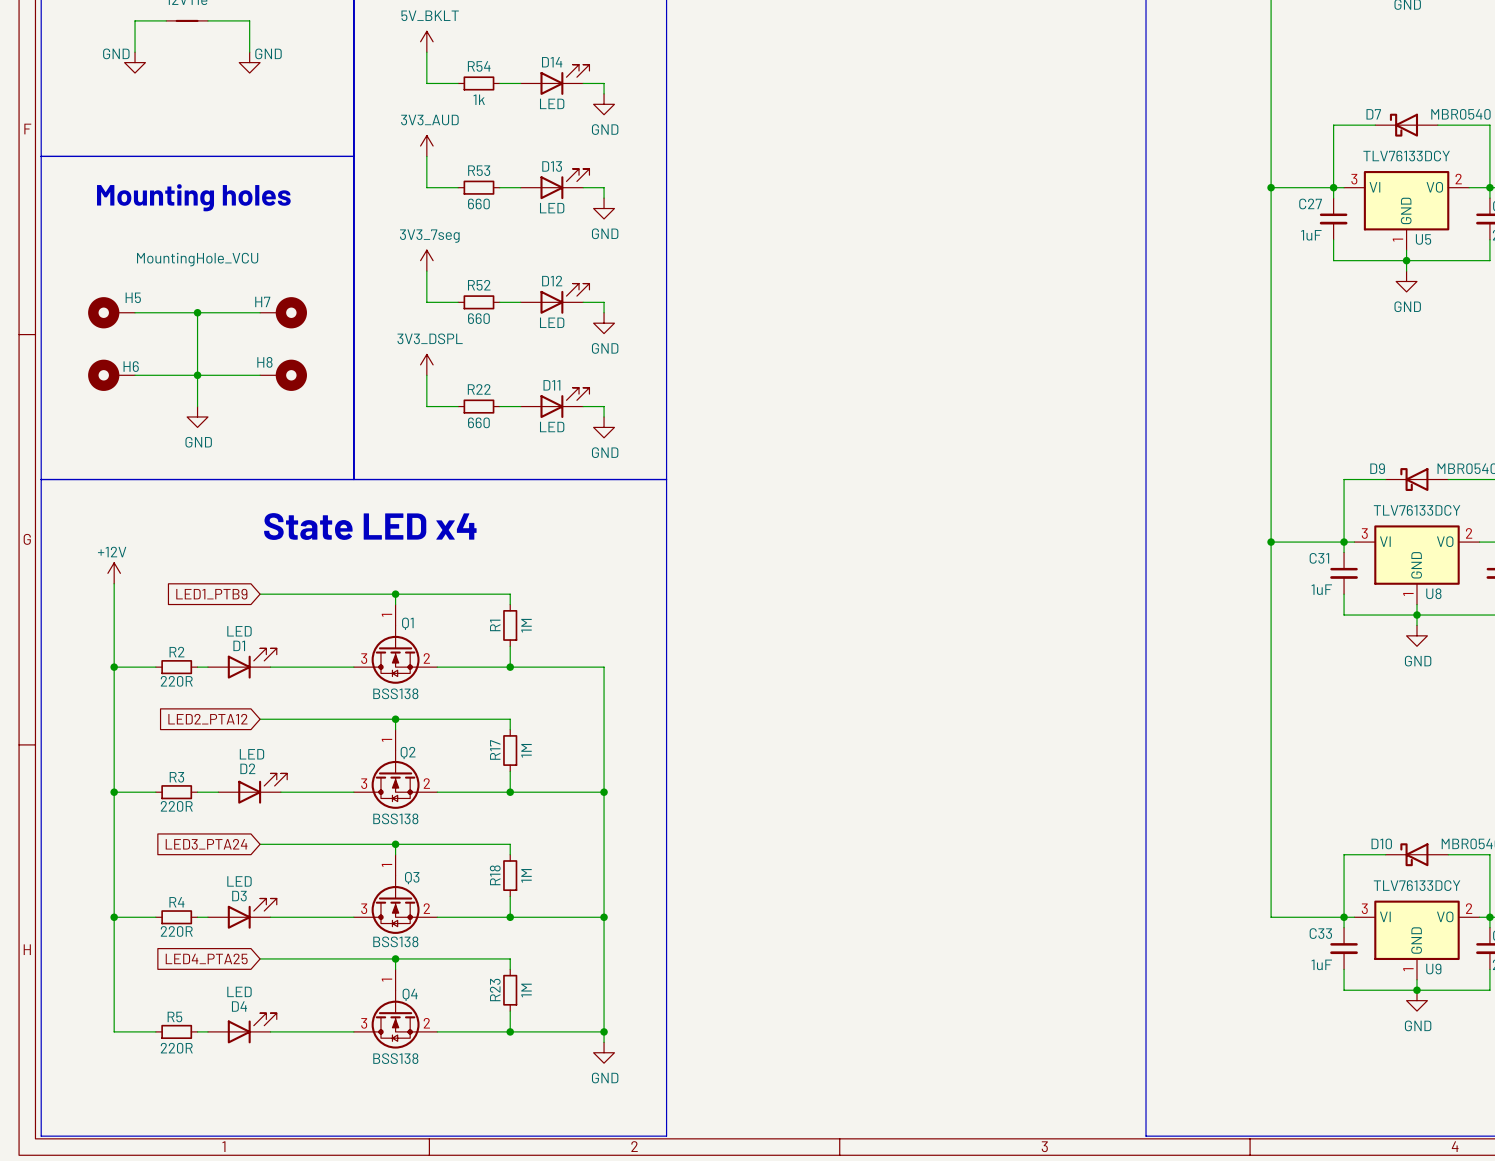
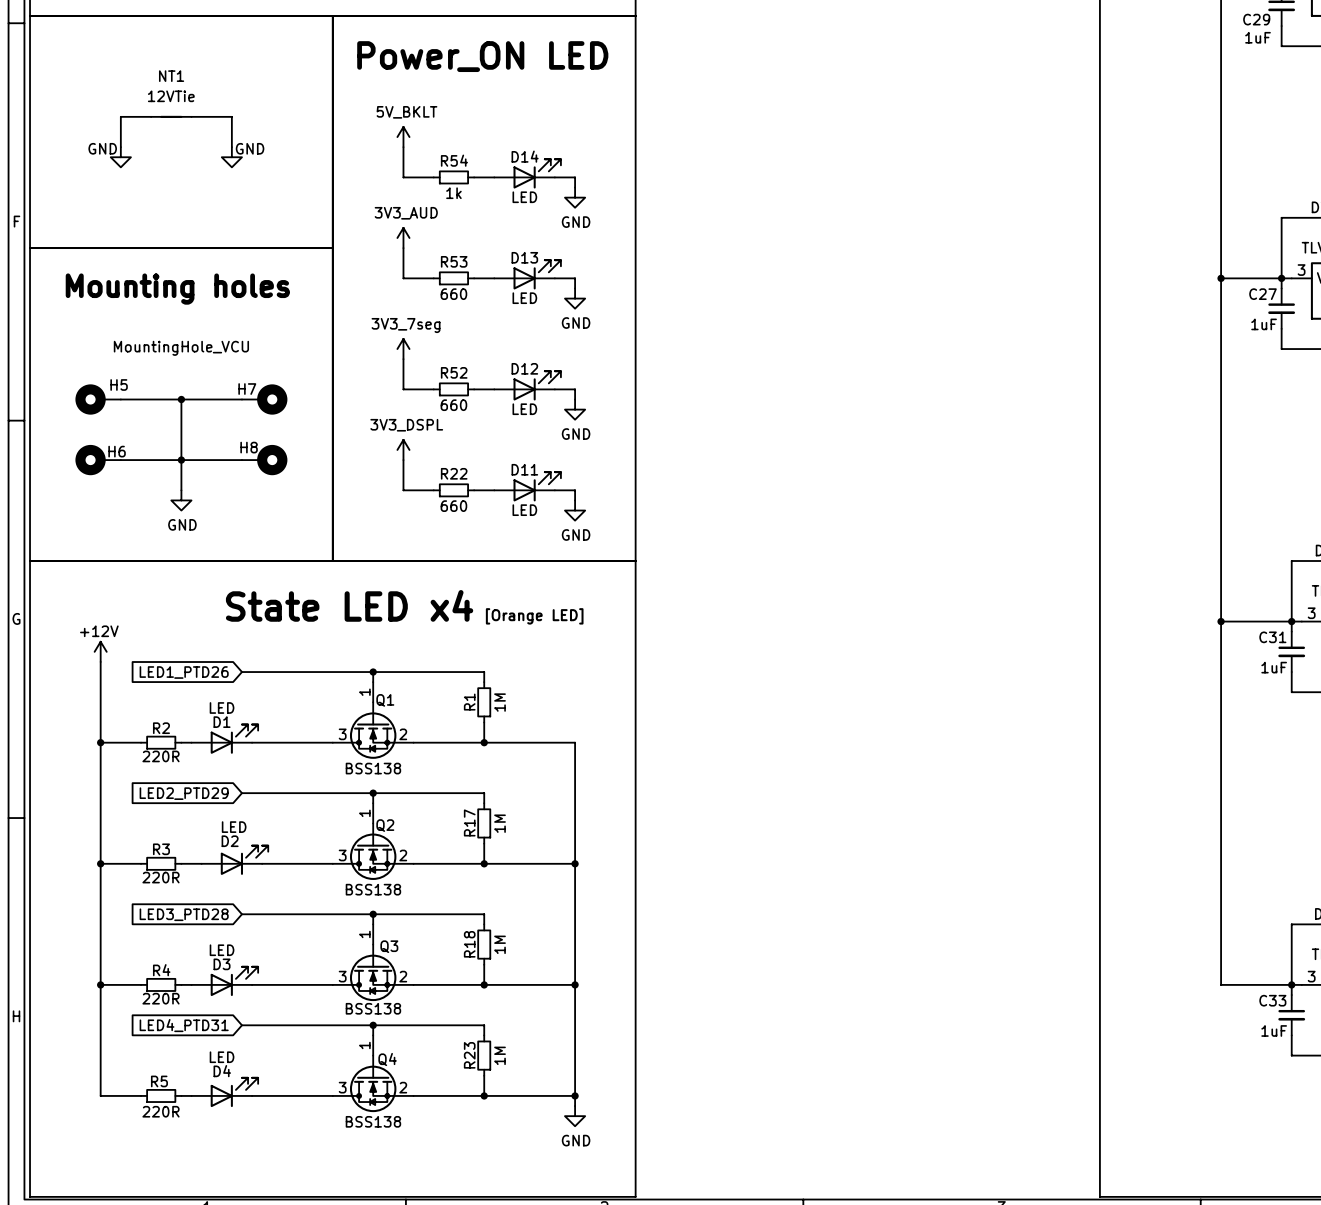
text: none -> [Orange LED] (534, 616)
global label: LED1_PTB9 (211, 594) -> LED1_PTD26 (184, 672)
global label: LED2_PTA12 (207, 719) -> LED2_PTD29 (184, 793)
global label: LED3_PTA24 (206, 844) -> LED3_PTD28 (184, 914)
global label: LED4_PTA25 (206, 958) -> LED4_PTD31 (184, 1025)

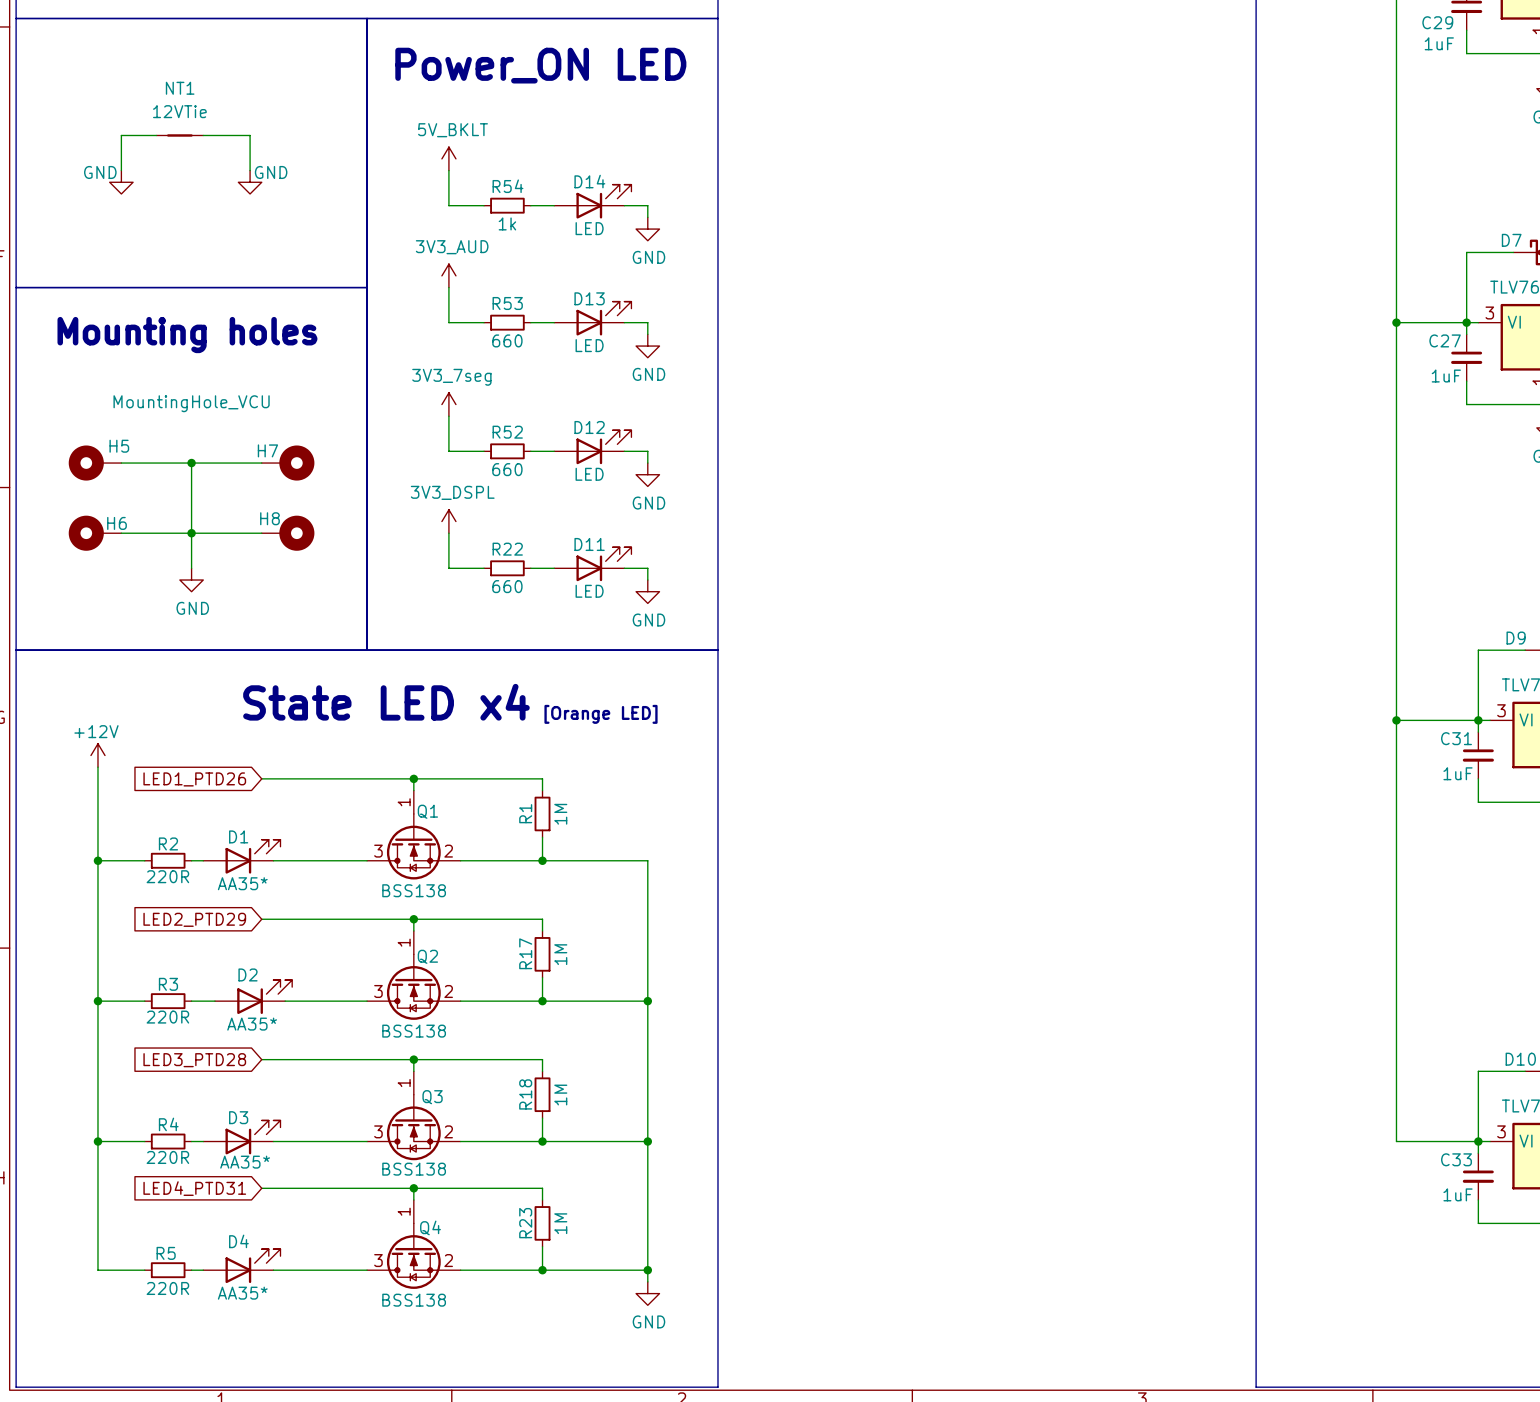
D1 value: LED (222, 707) -> AA35* (242, 883)
D2 value: LED (234, 827) -> AA35* (252, 1024)
D3 value: LED (222, 950) -> AA35* (245, 1162)
D4 value: LED (222, 1057) -> AA35* (242, 1293)

